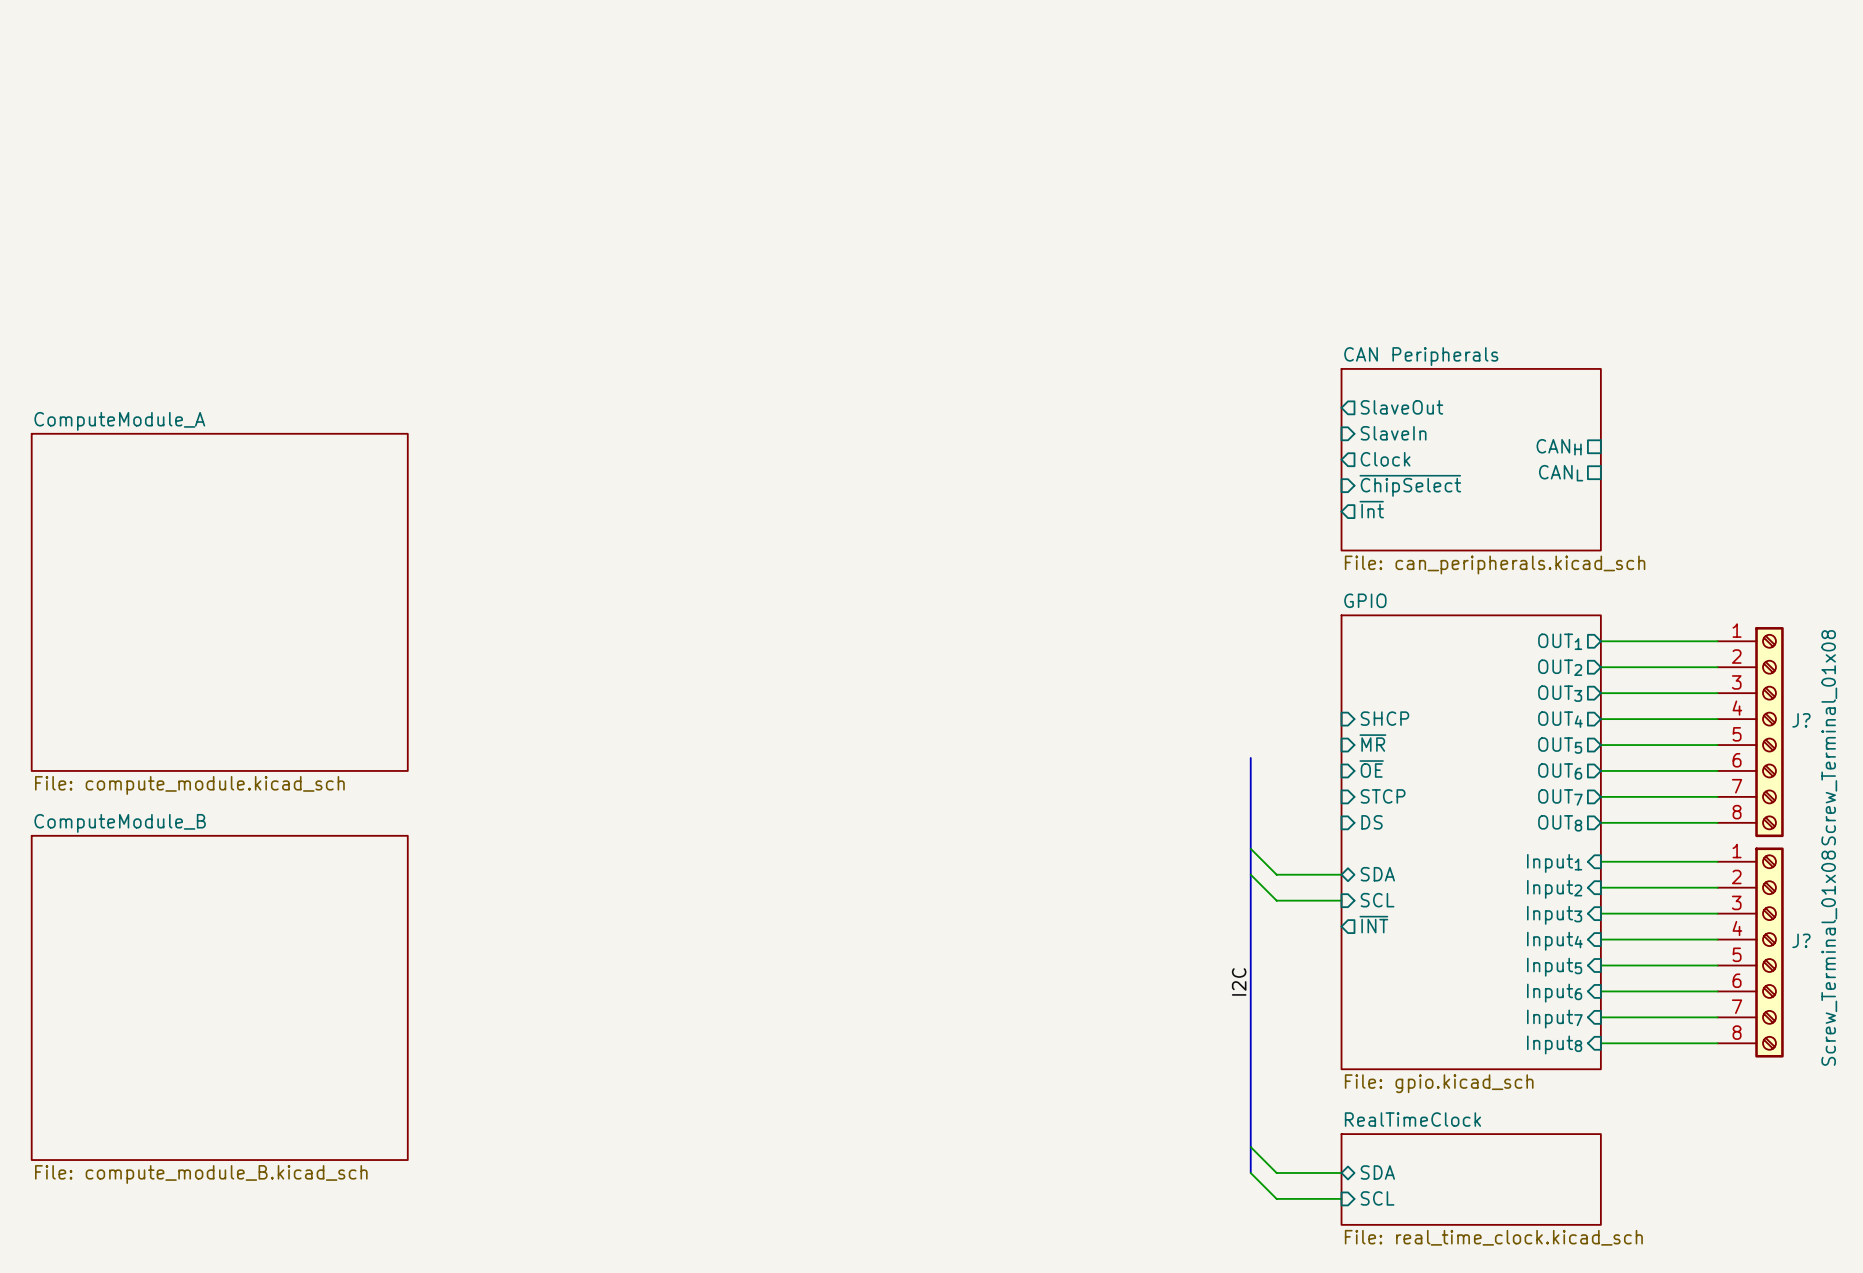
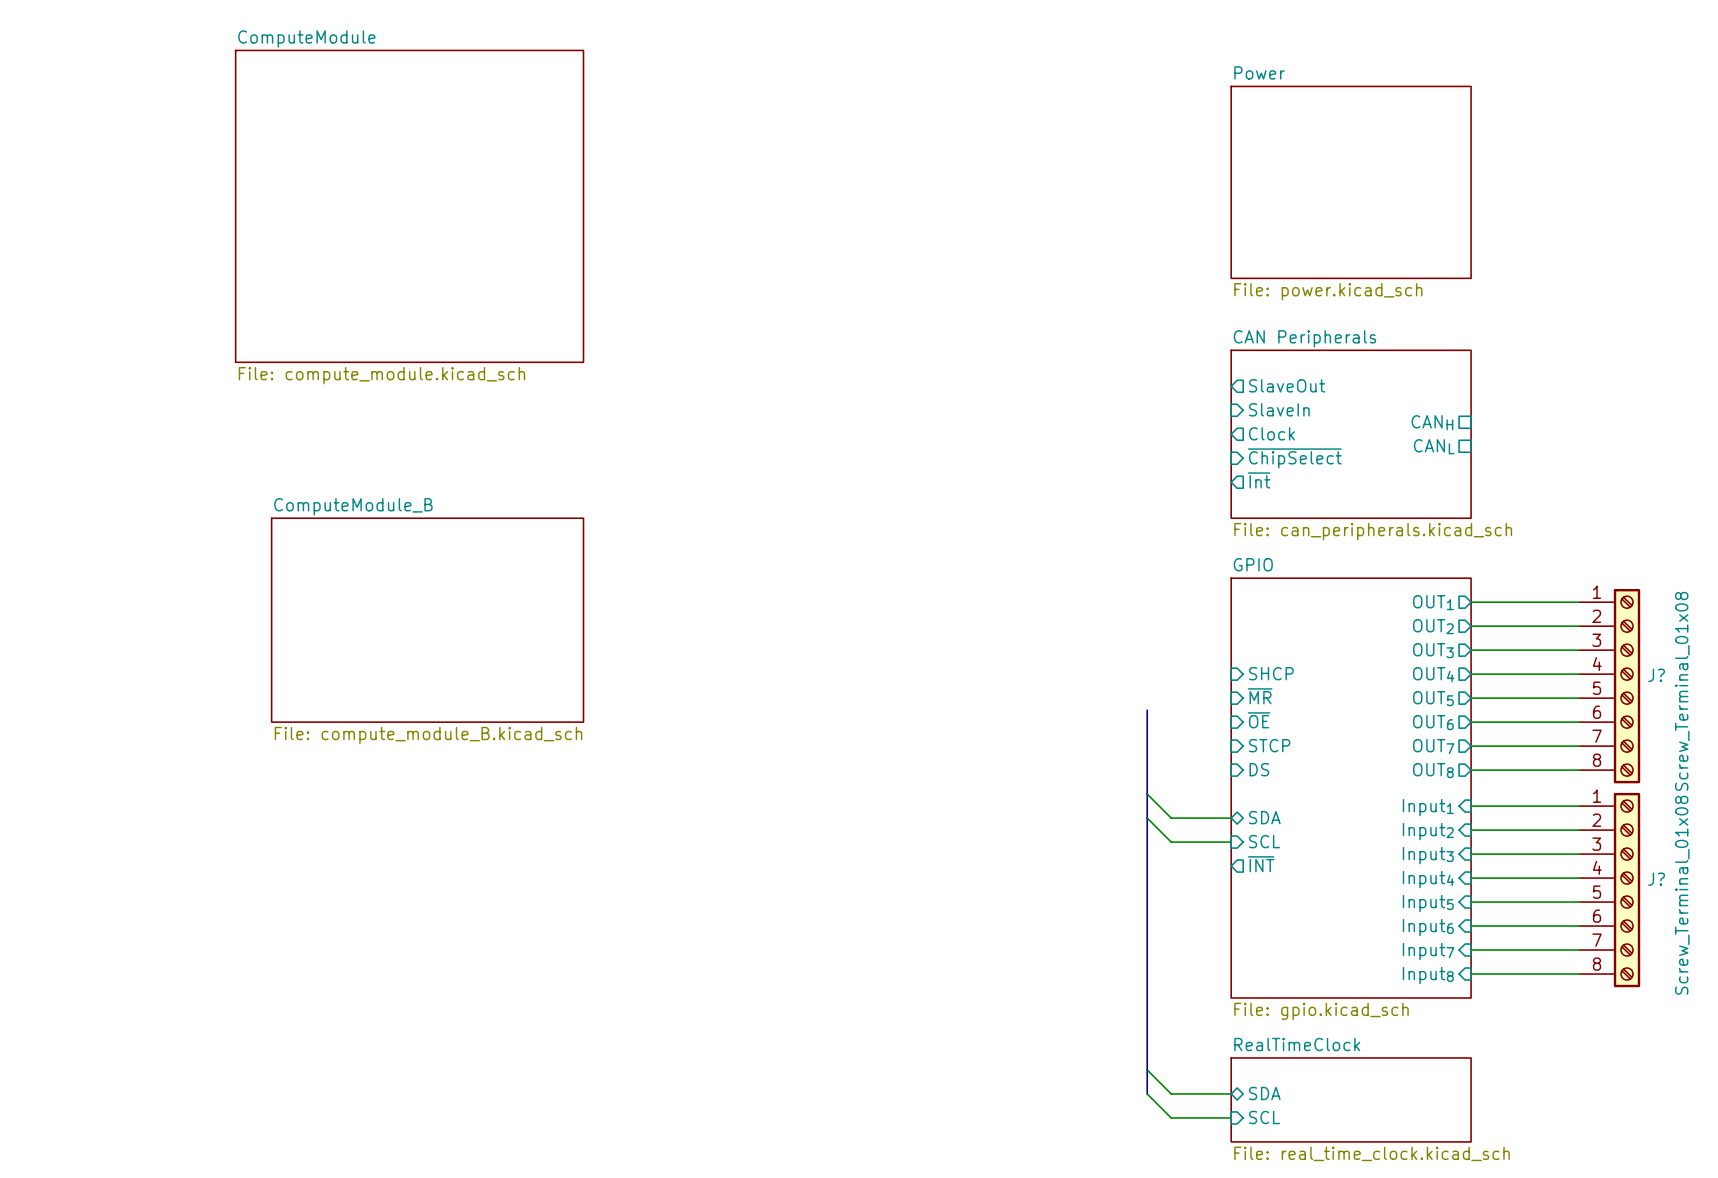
sheet Power: none -> File: power.kicad_sch (1351, 182)
sheet ComputeModule: none -> File: compute_module.kicad_sch (409, 206)
sheet ComputeModule_A: File: compute_module.kicad_sch (219, 602) -> none
sheet ComputeModule_B: none -> File: compute_module_B.kicad_sch (427, 620)
label: I2C (1239, 981) -> none
sheet ComputeModule_B: File: compute_module_B.kicad_sch (219, 997) -> none

